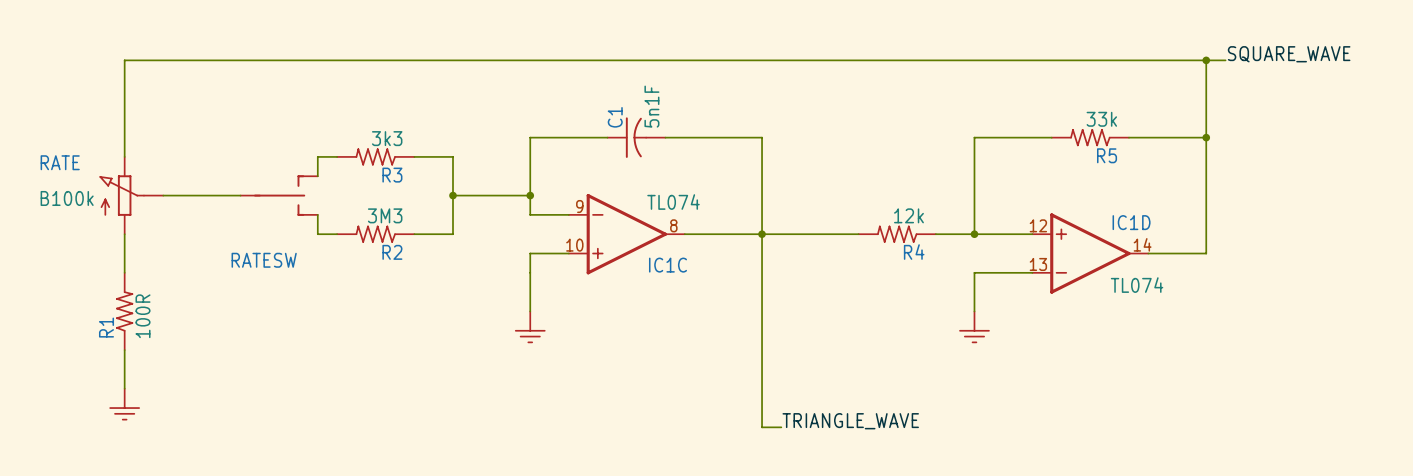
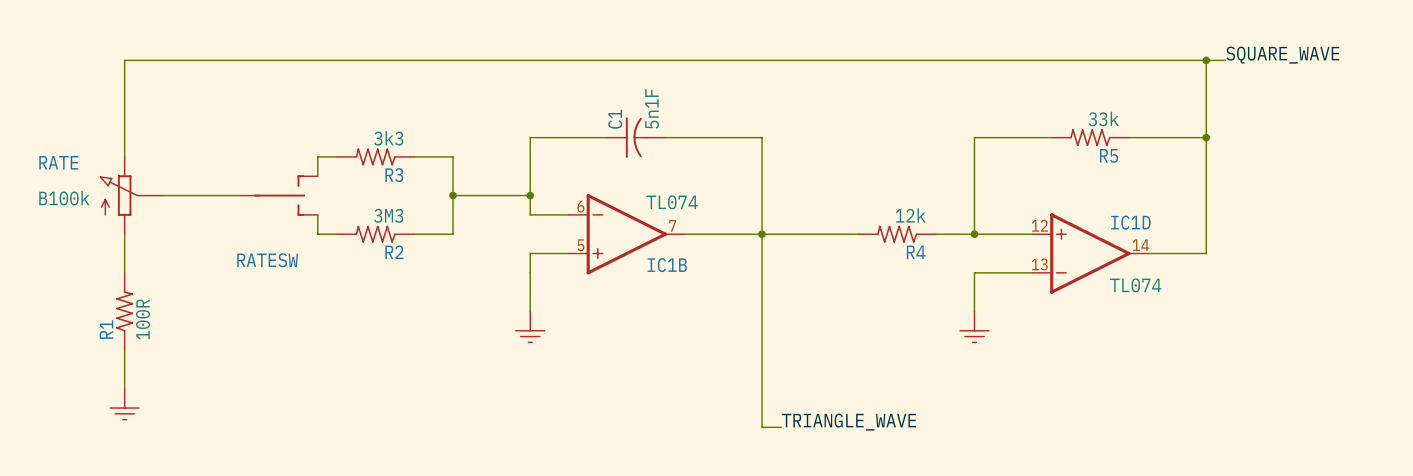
IC1C pin number: 9 (579, 206) -> 6 (580, 206)
IC1C pin number: 8 (673, 225) -> 7 (672, 225)
IC1C pin number: 10 (574, 245) -> 5 (580, 245)
IC1C name: IC1C (668, 265) -> IC1B (667, 265)

